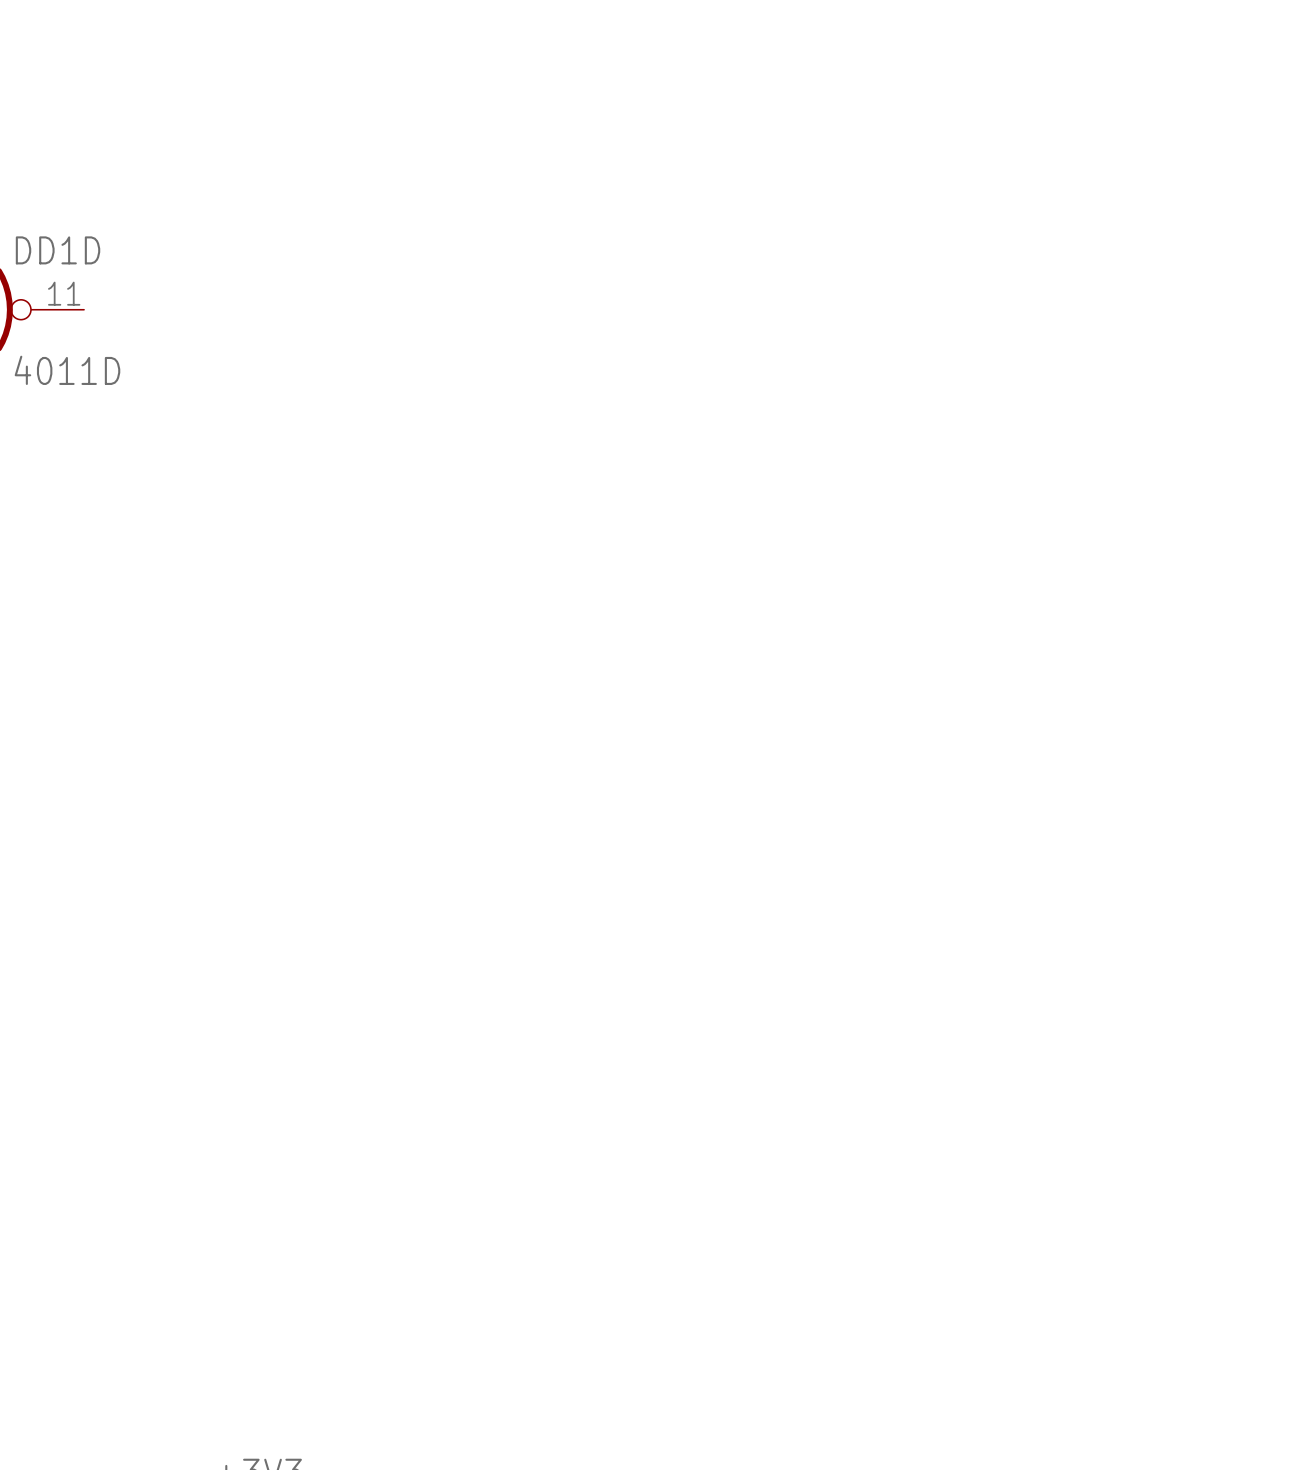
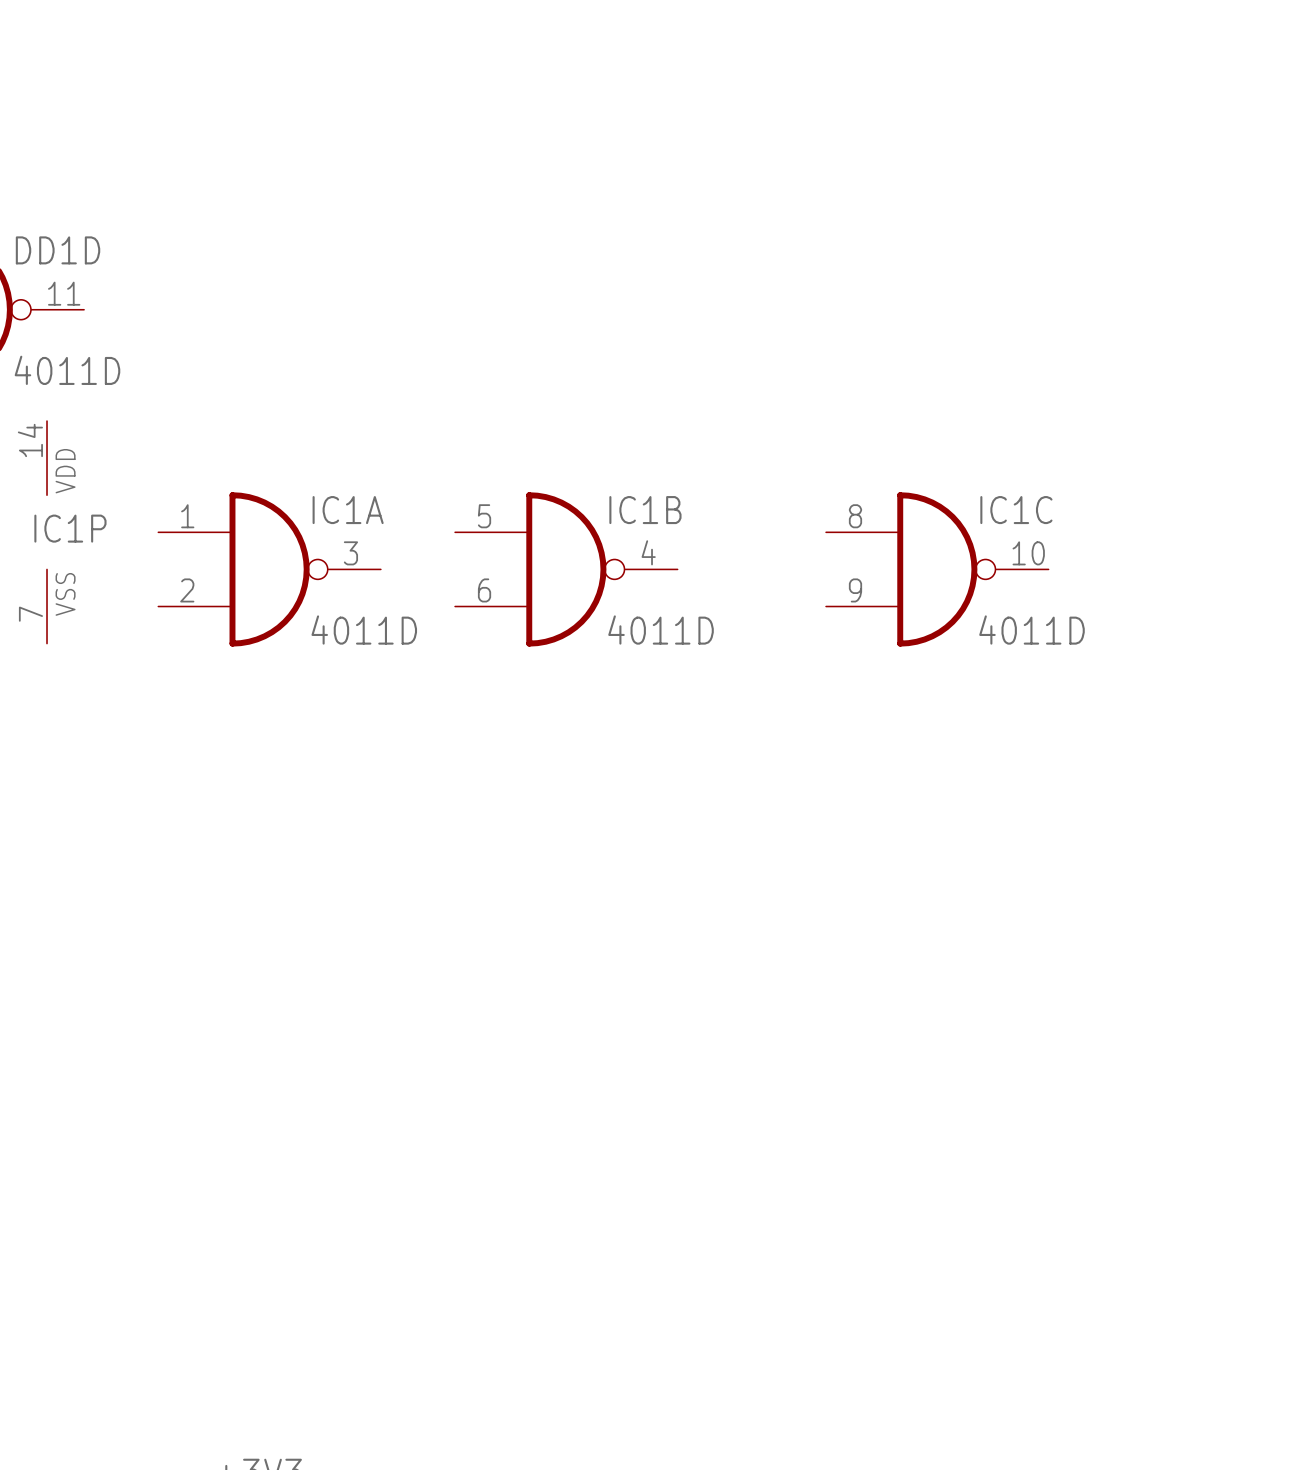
IC1P: none -> (47, 532)
IC1A: none -> 4011D (269, 569)
IC1B: none -> 4011D (566, 569)
IC1C: none -> 4011D (937, 569)

